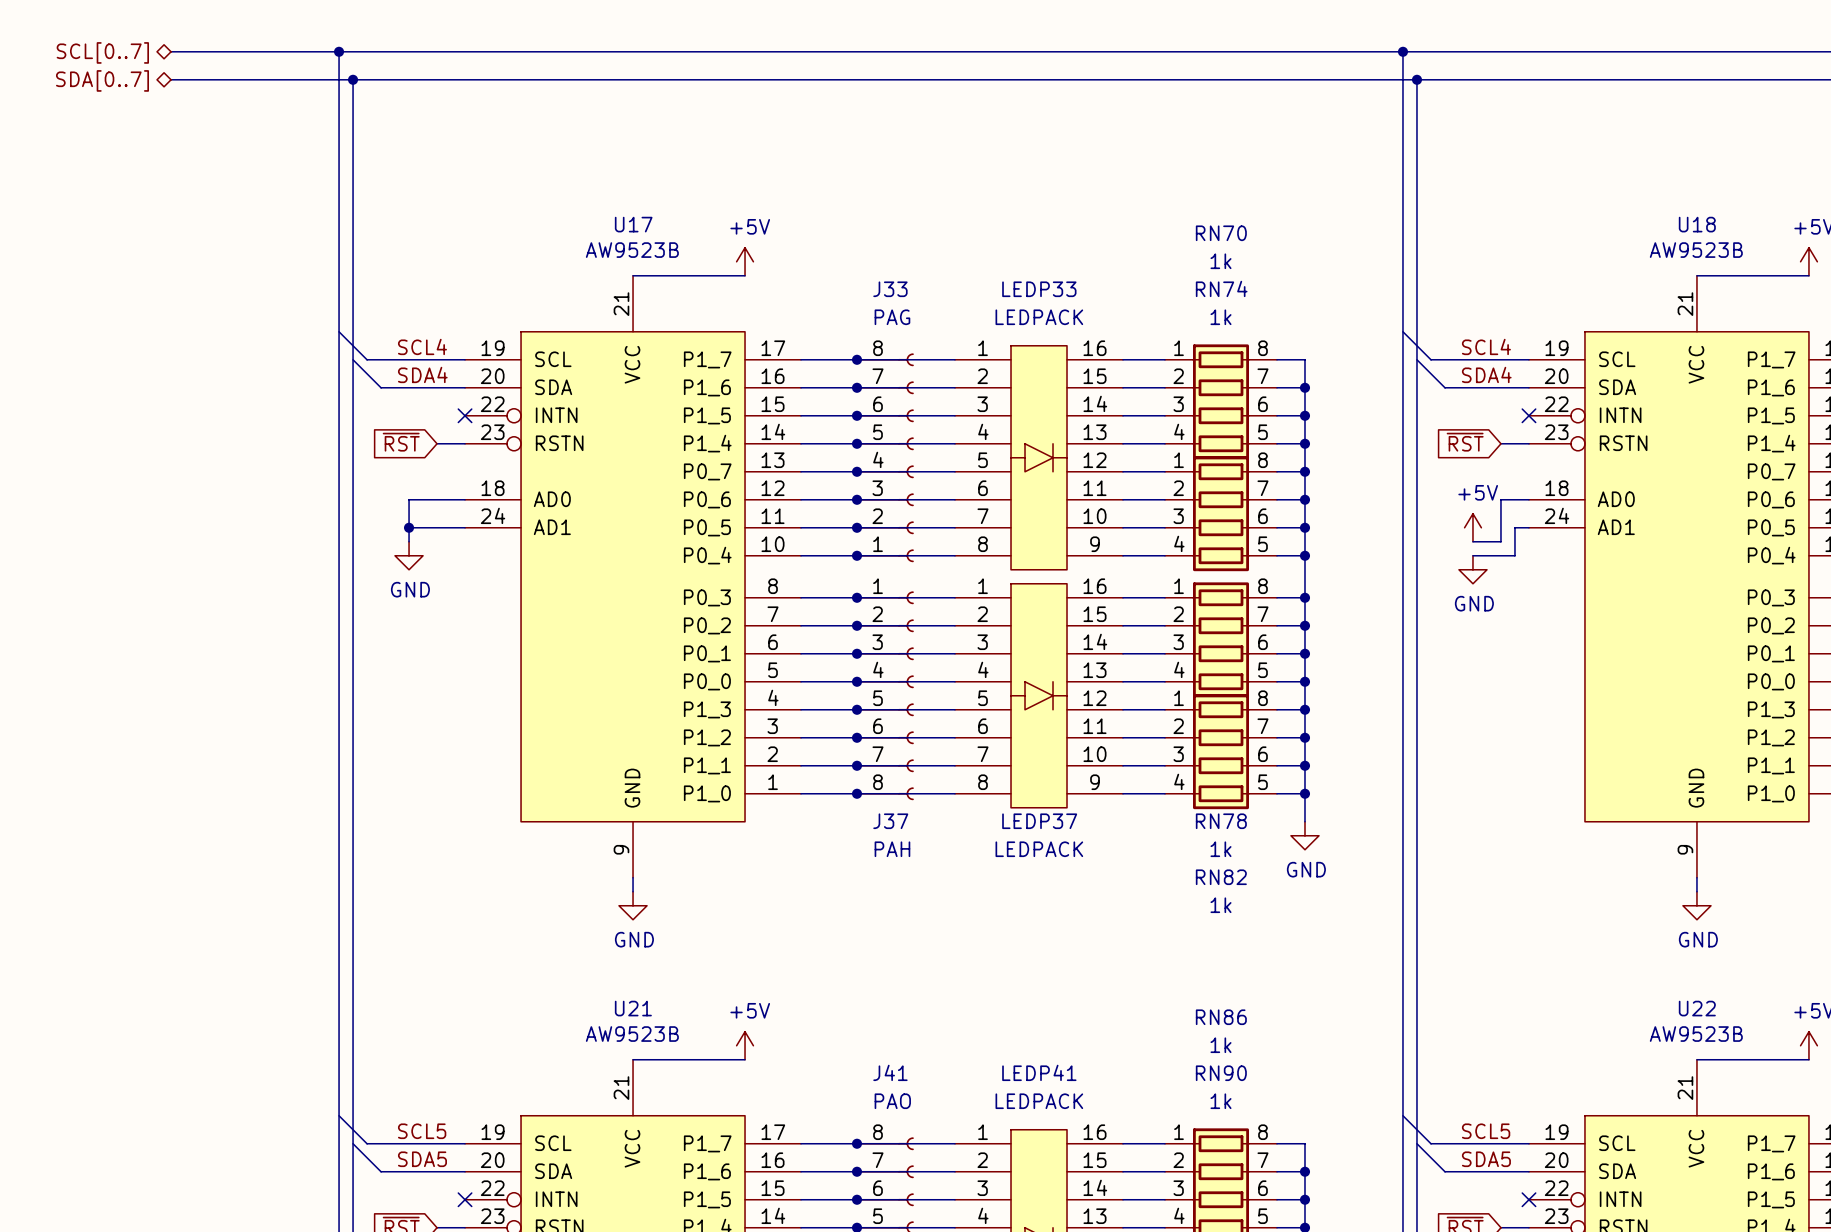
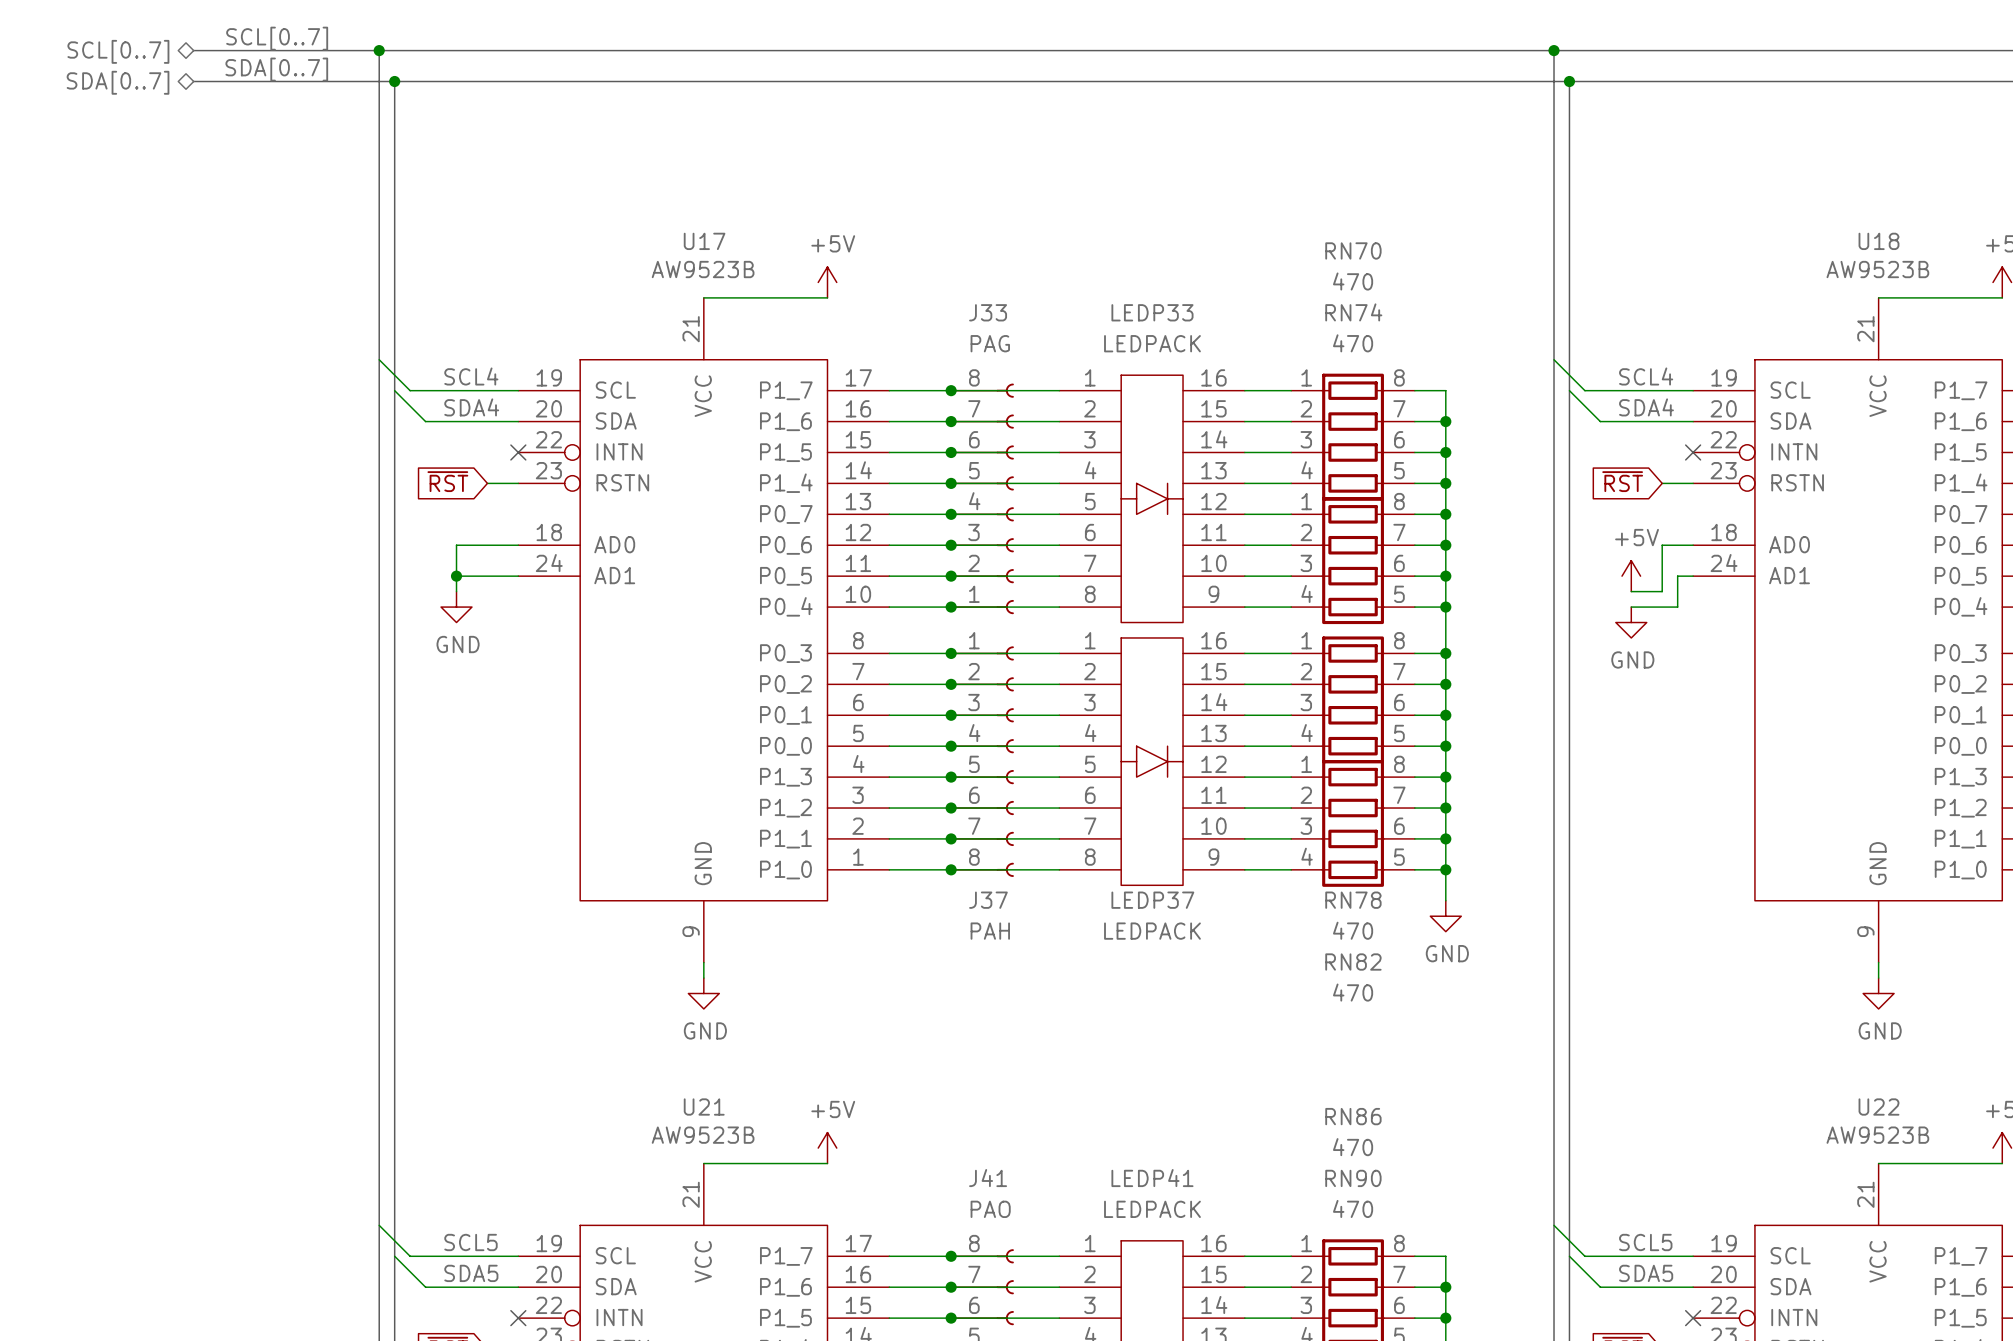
label: none -> SCL[0..7] (277, 38)
label: none -> SDA[0..7] (276, 69)
RN70 value: 1k (1220, 261) -> 470 (1353, 281)
RN74 value: 1k (1220, 317) -> 470 (1353, 343)
RN78 value: 1k (1220, 849) -> 470 (1353, 930)
RN82 value: 1k (1220, 905) -> 470 (1353, 992)
RN86 value: 1k (1220, 1045) -> 470 (1353, 1147)
RN90 value: 1k (1220, 1101) -> 470 (1353, 1208)

